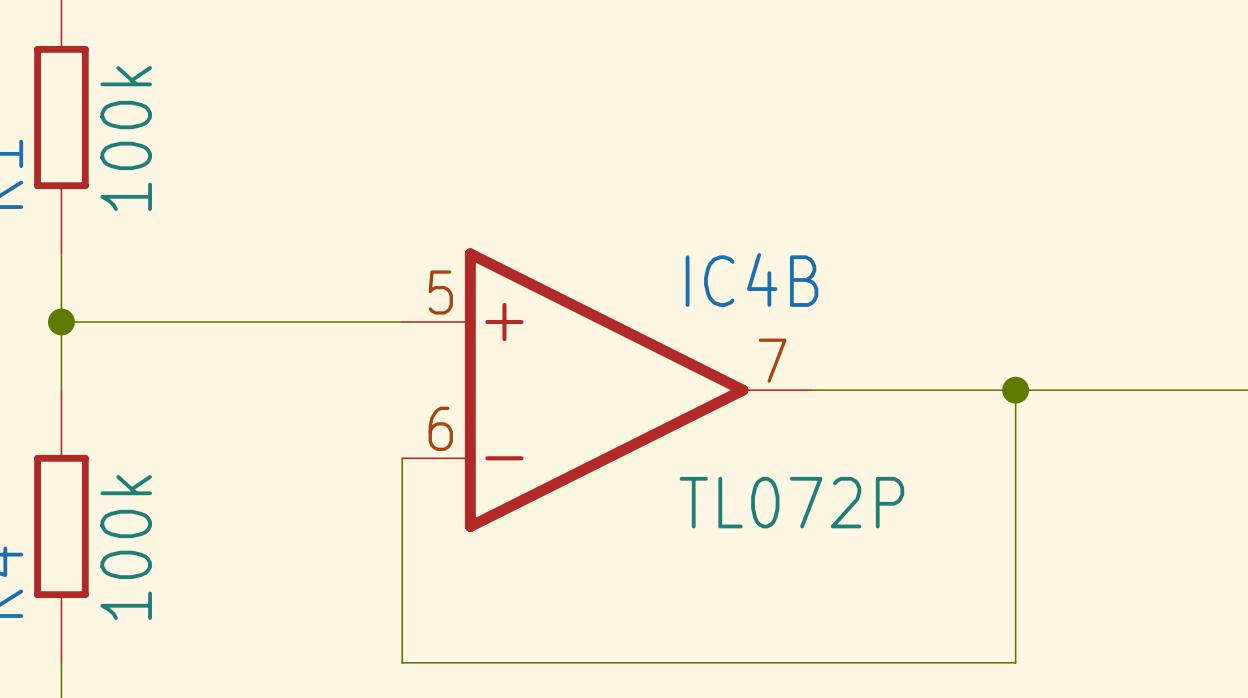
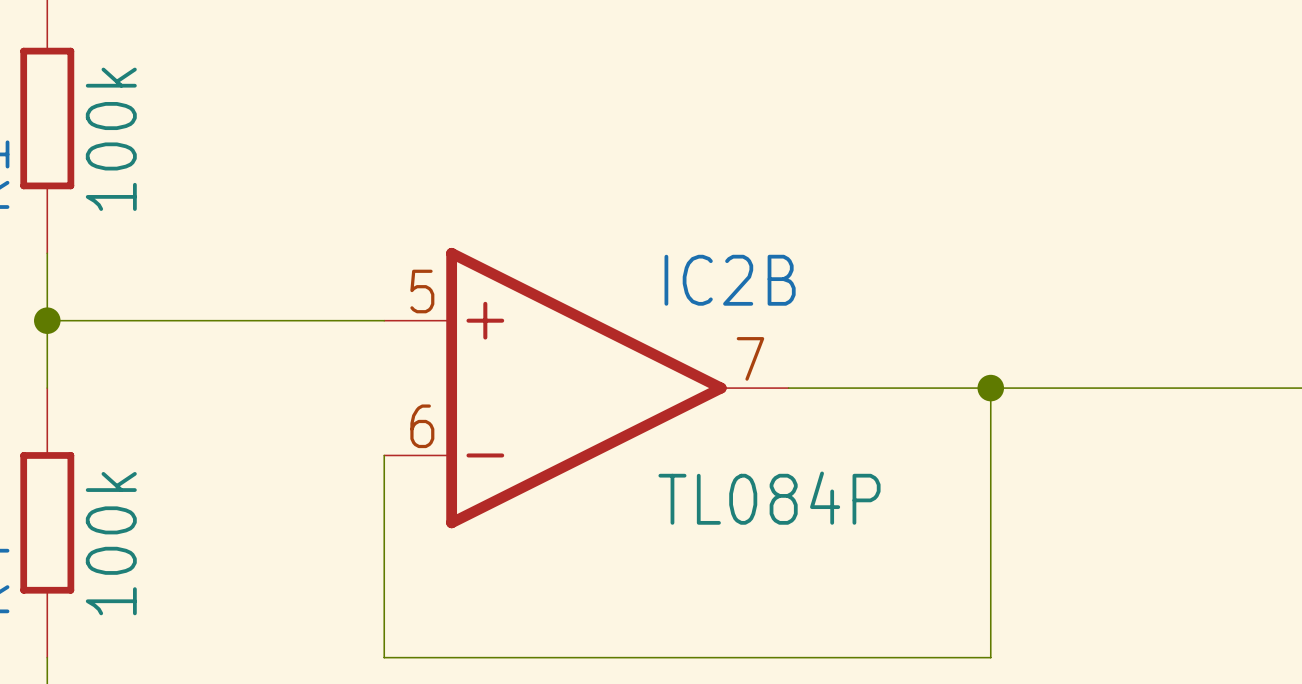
IC4B name: IC4B (751, 279) -> IC2B (730, 280)
IC4B value: TL072P (791, 502) -> TL084P (769, 498)

